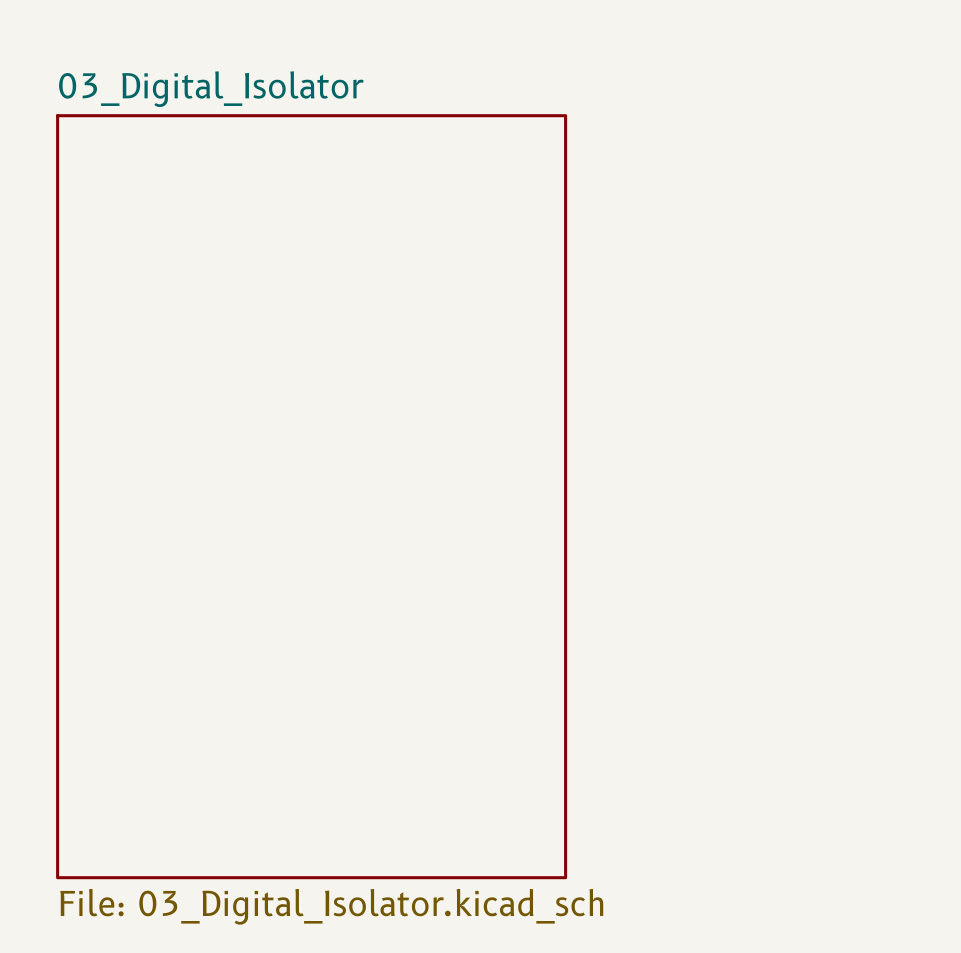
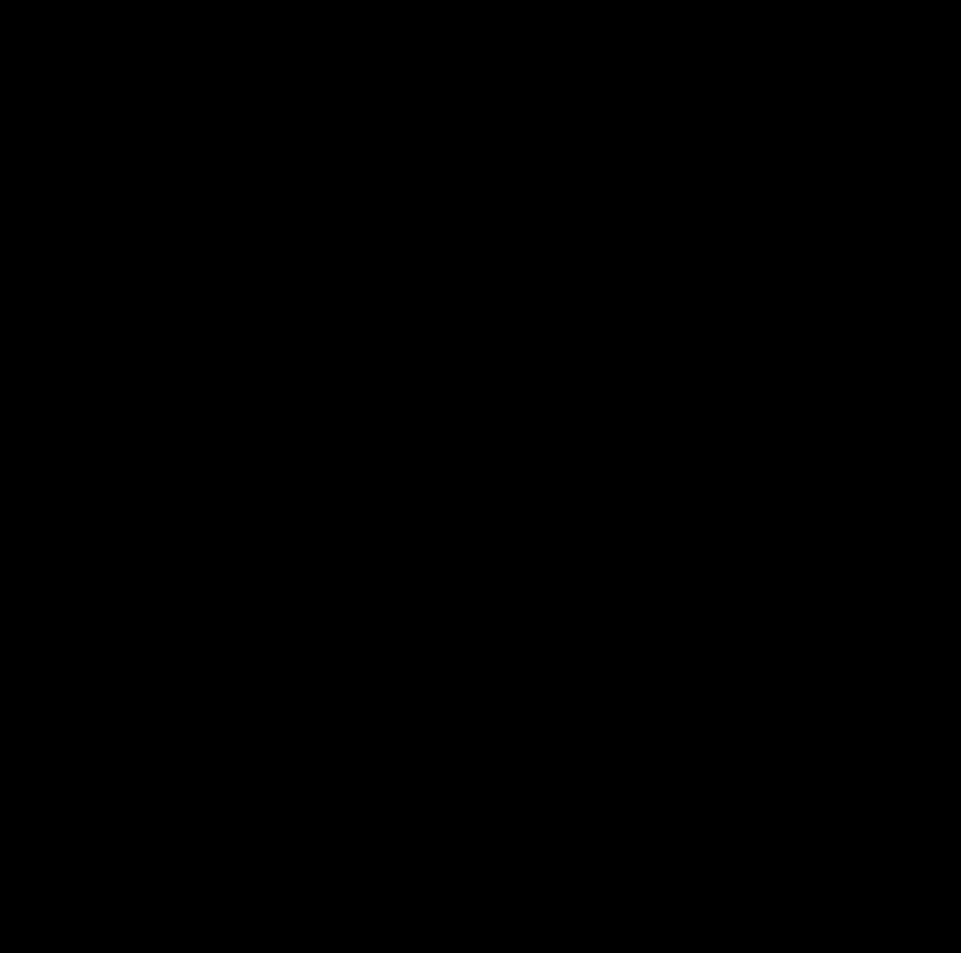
sheet 03_Digital_Isolator: File: 03_Digital_Isolator.kicad_sch (311, 496) -> none

